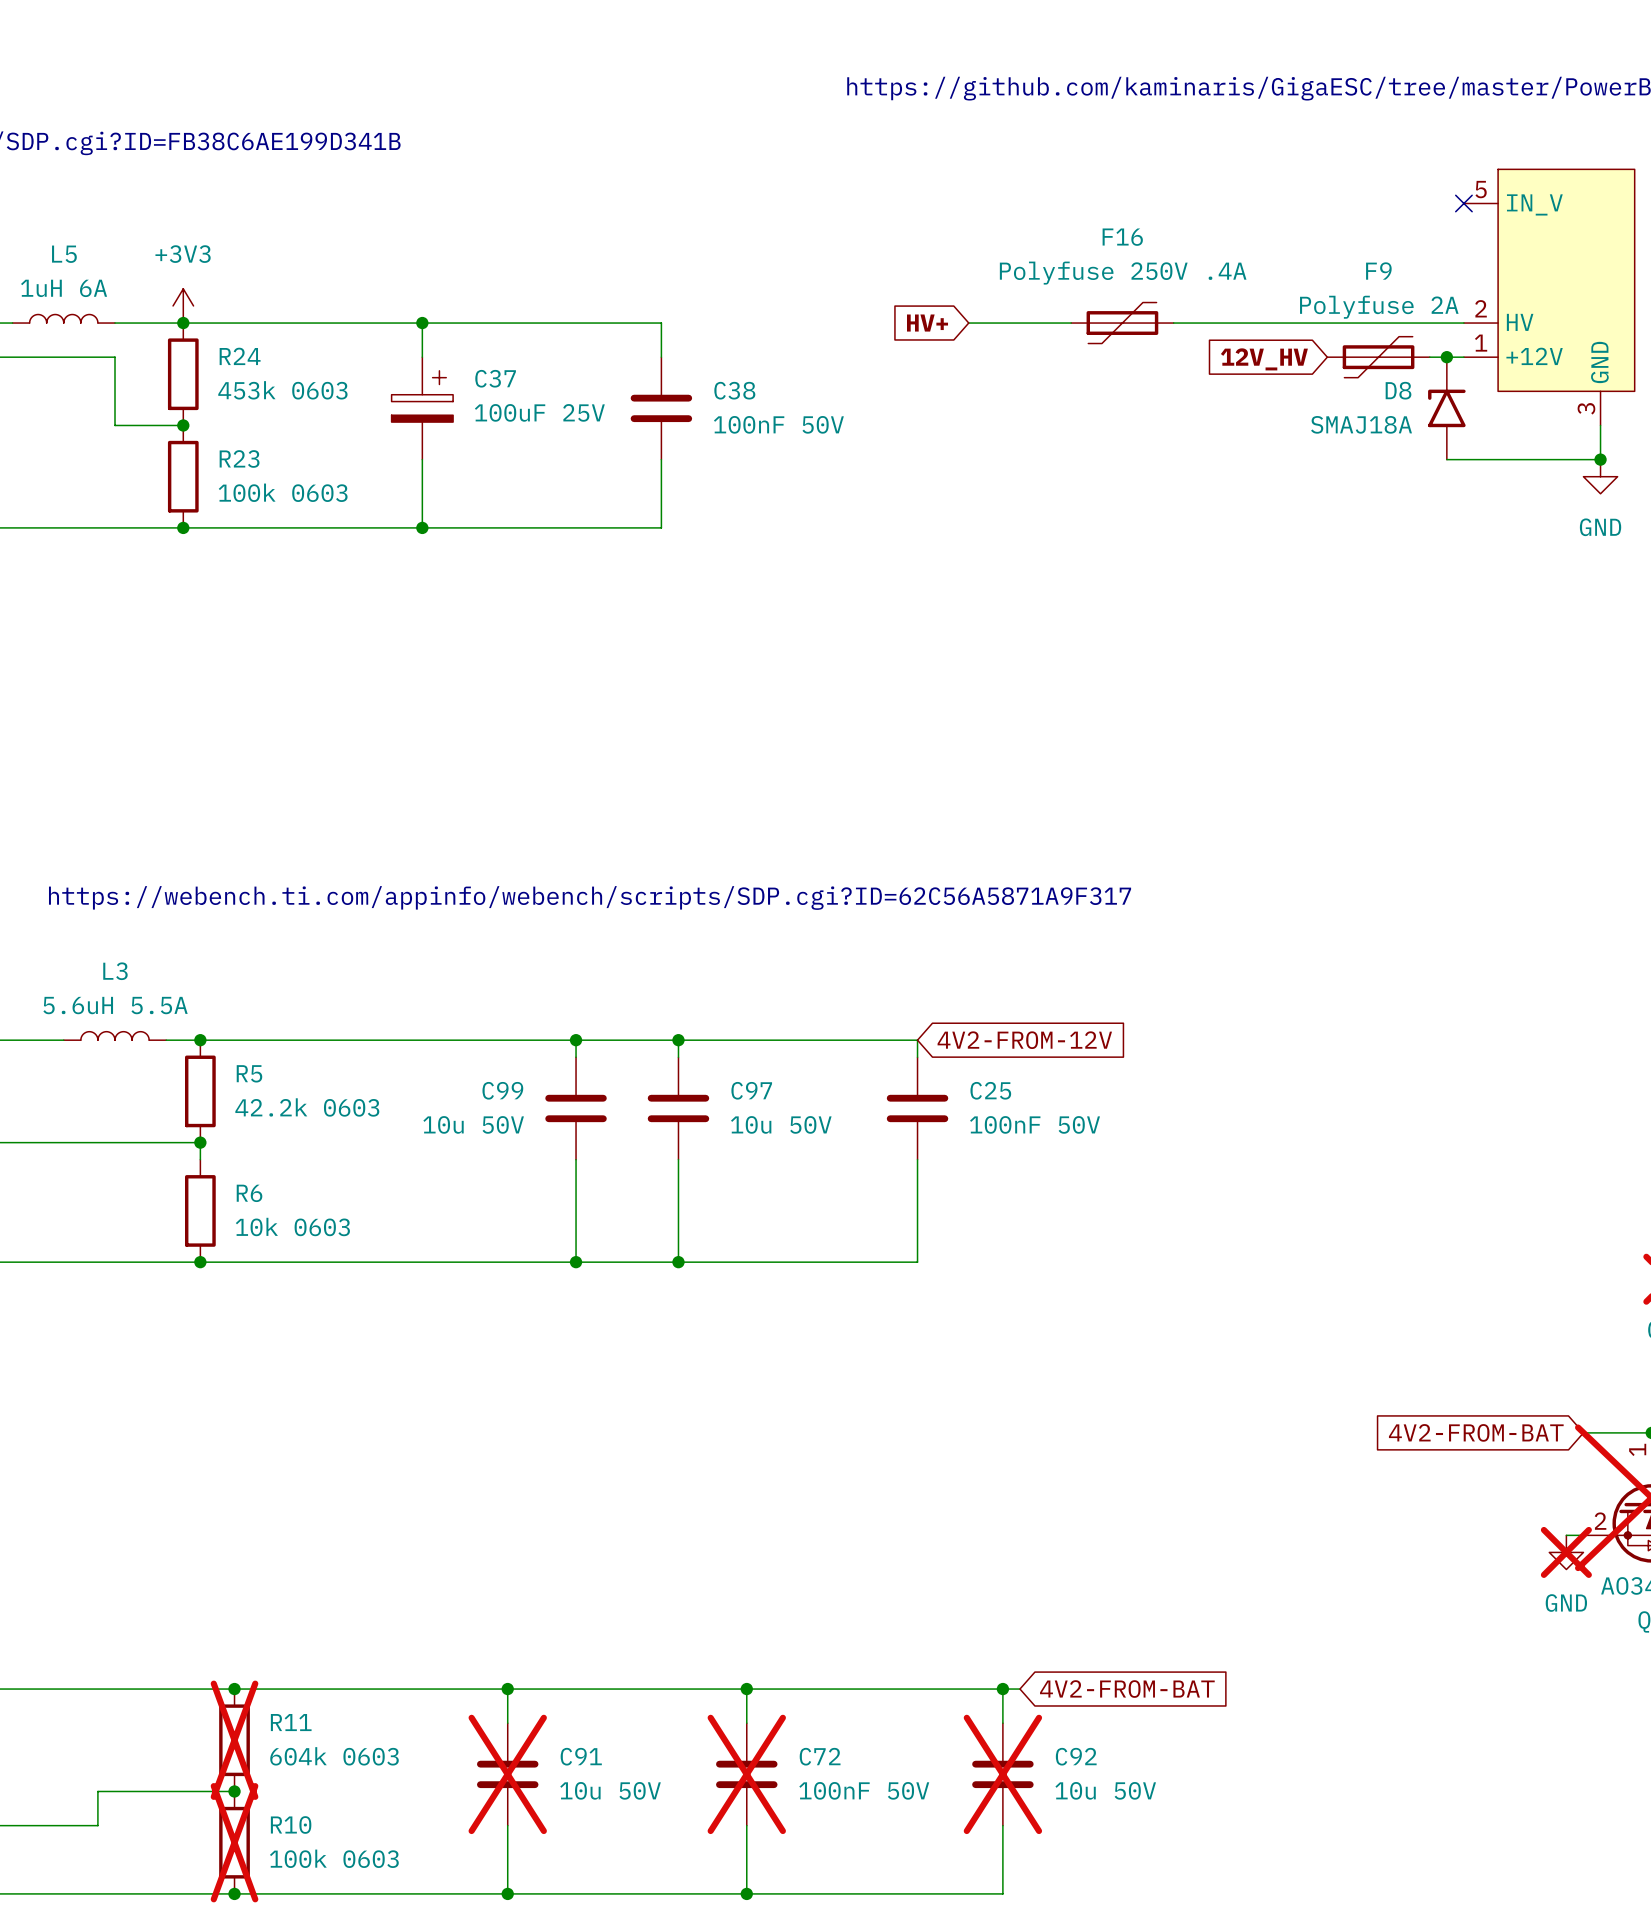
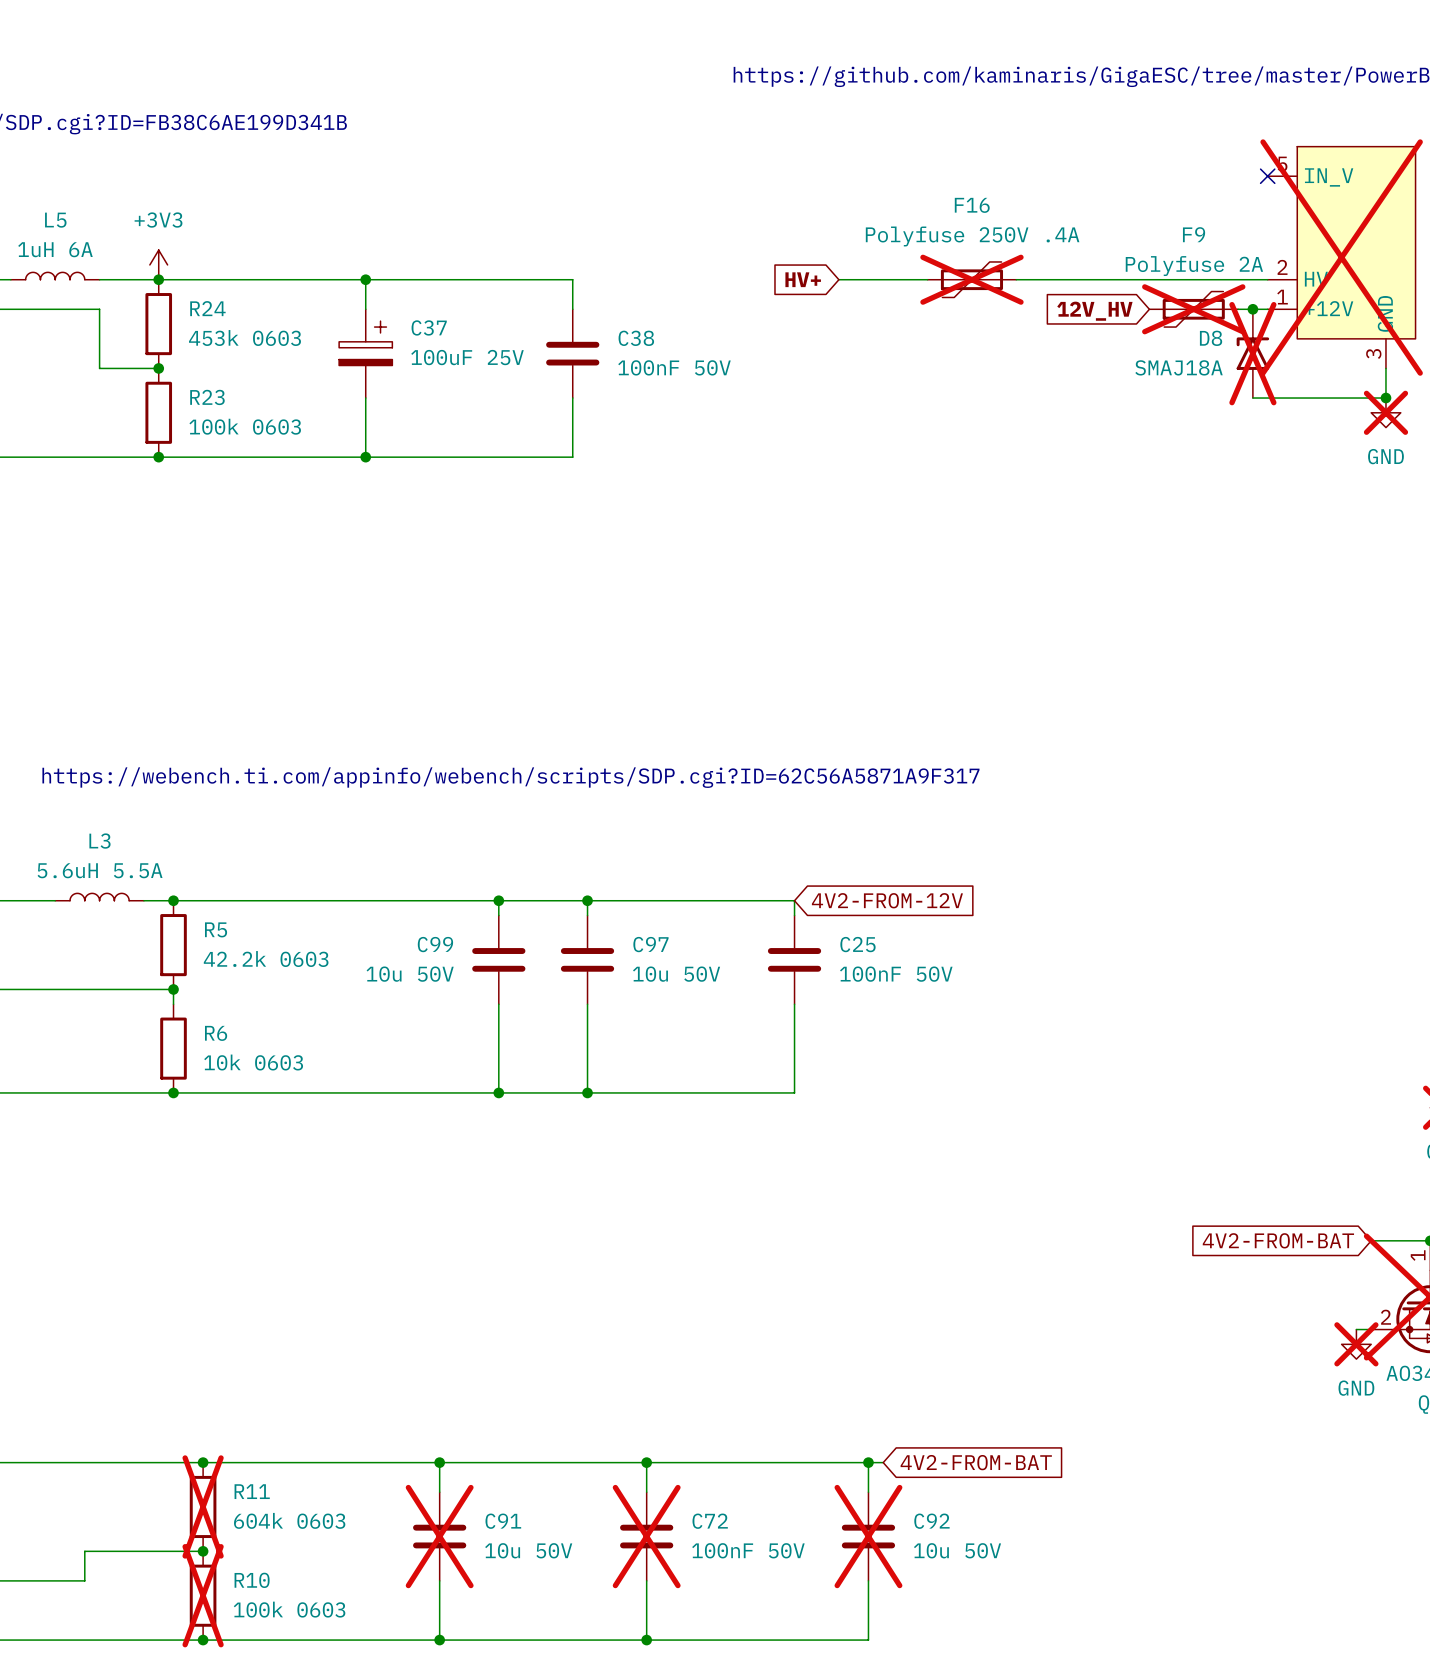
part do-not-place cross: none -> (1341, 257)
F16 do-not-place cross: none -> (971, 279)
F9 do-not-place cross: none -> (1193, 309)
D8 do-not-place cross: none -> (1252, 353)
power symbol do-not-place cross: none -> (1385, 412)

